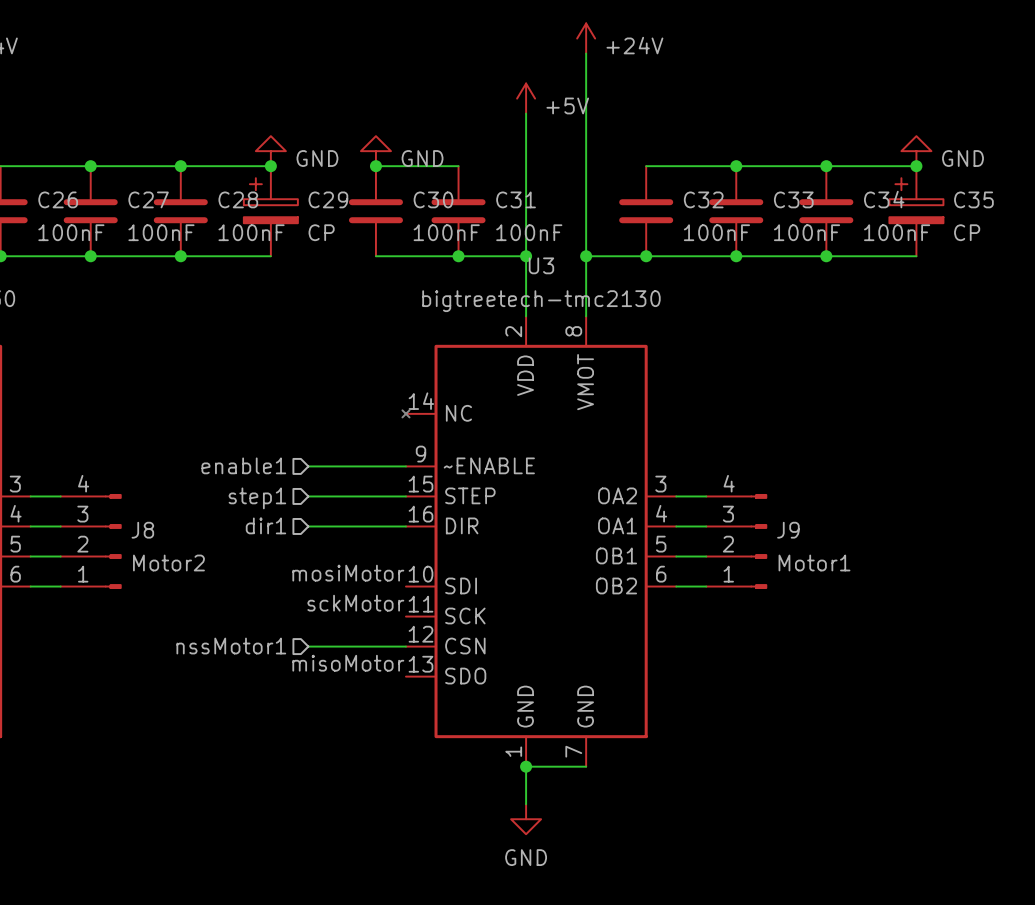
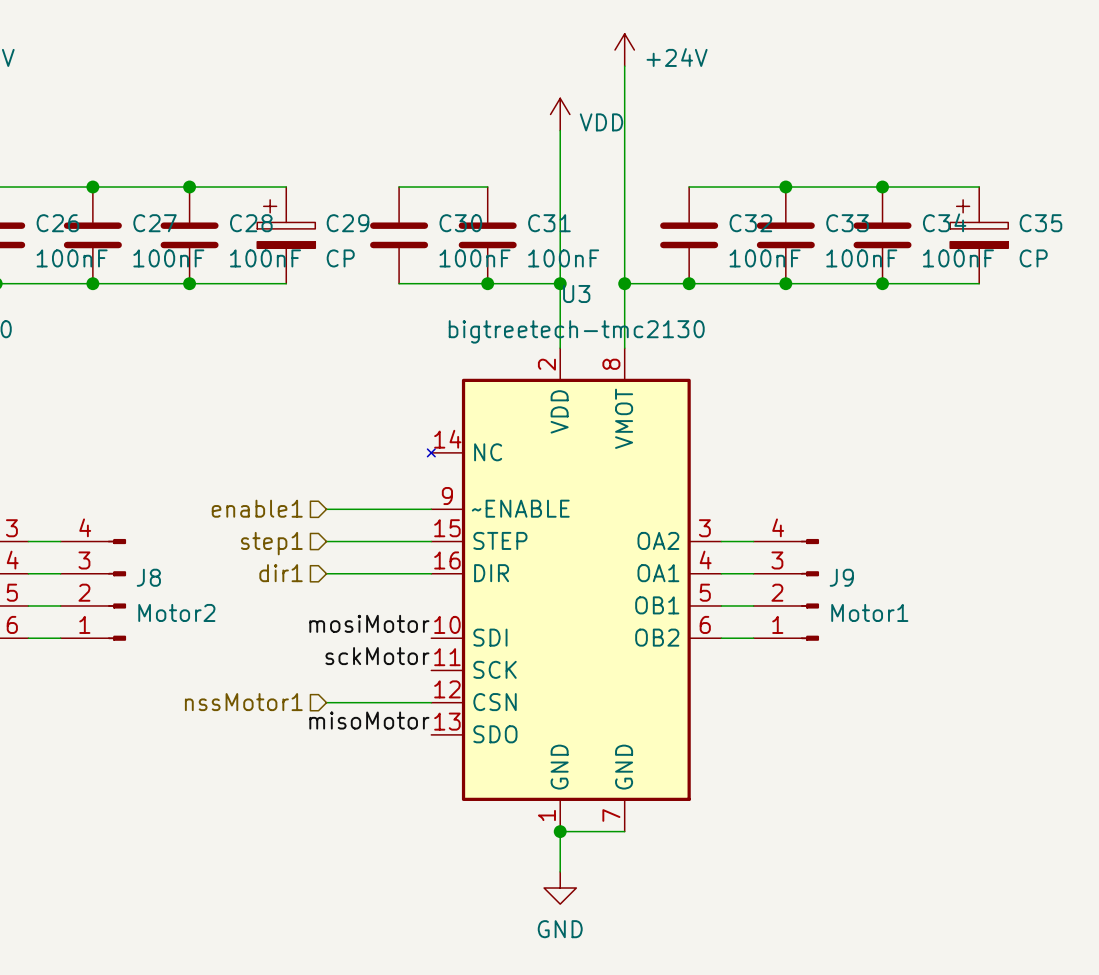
power symbol: +5V (526, 98) -> VDD (560, 114)
power symbol: GND (270, 151) -> none
power symbol: GND (375, 151) -> none
power symbol: GND (916, 151) -> none
junction: (270, 166) -> none
junction: (375, 166) -> none
junction: (916, 166) -> none

